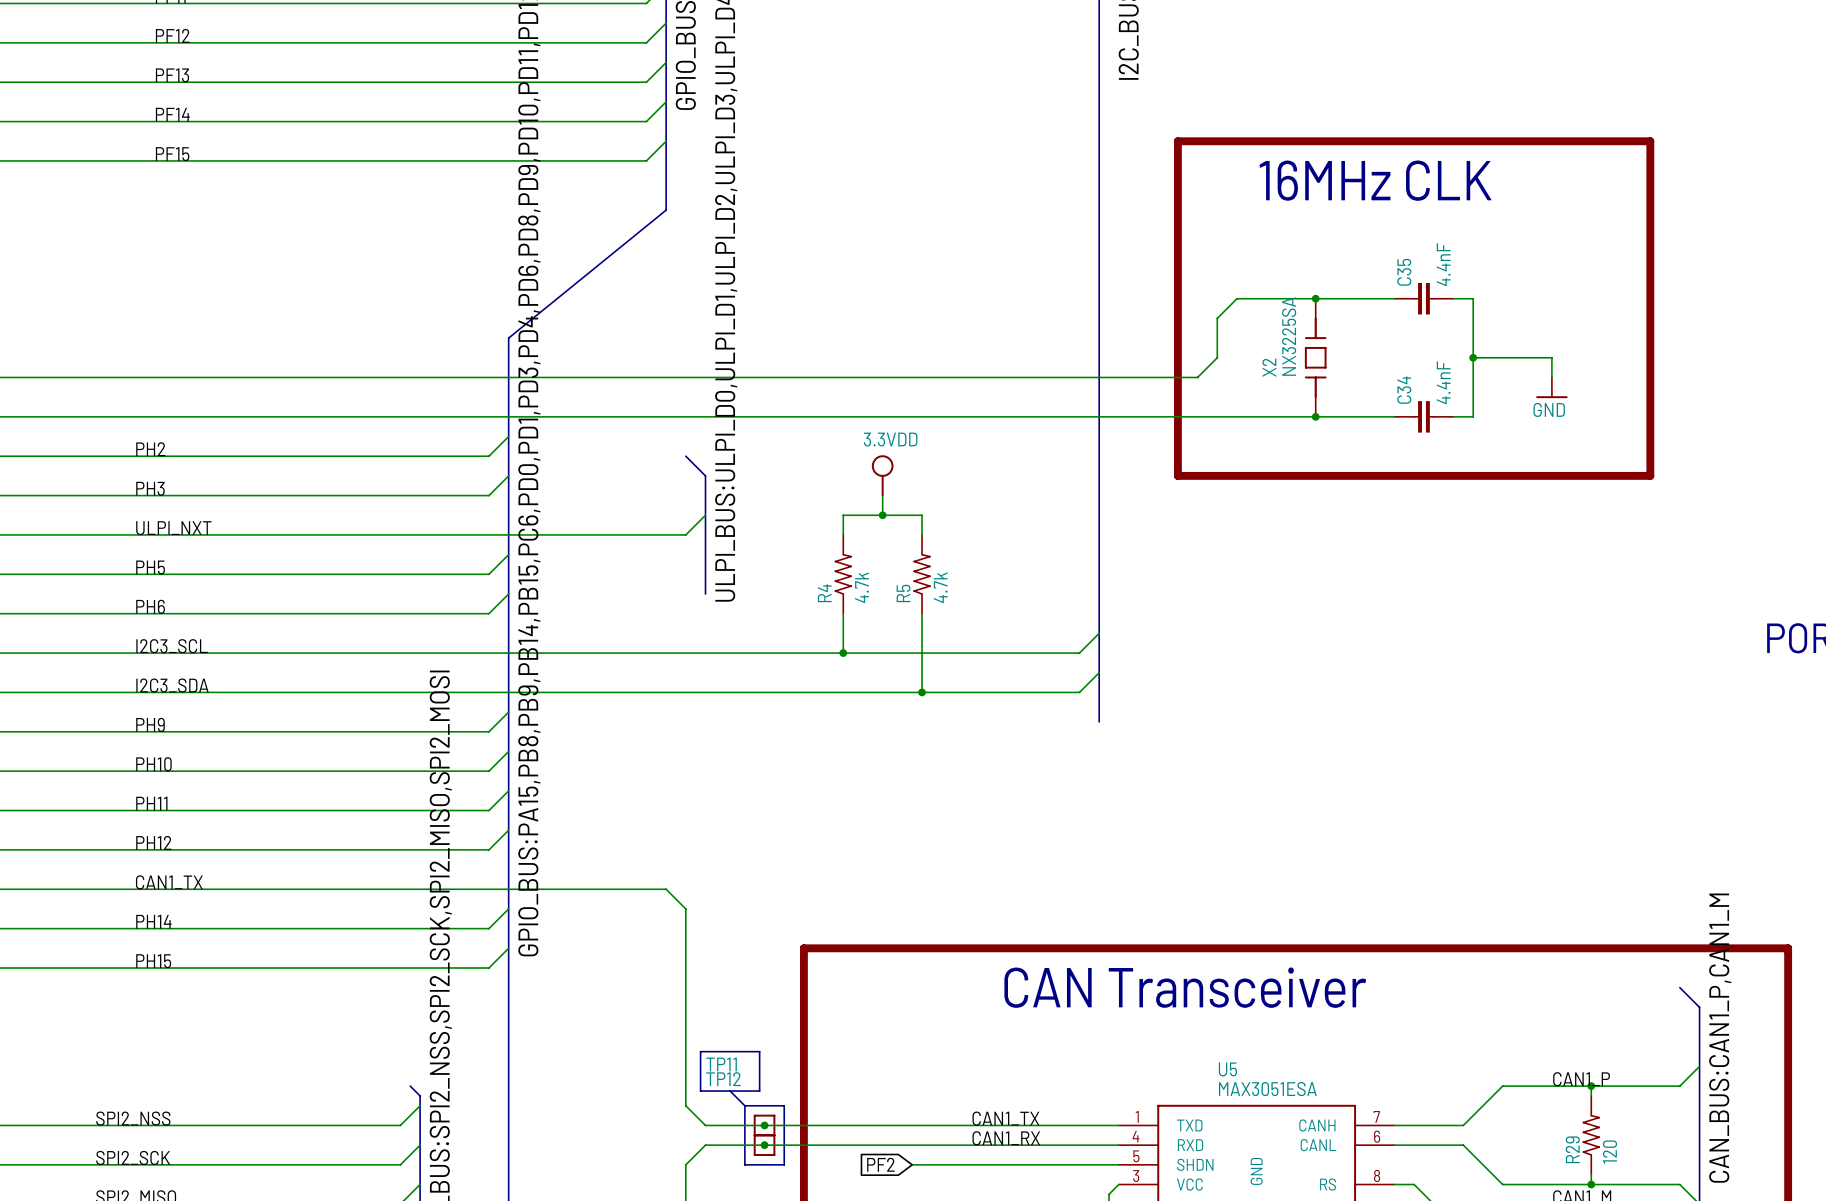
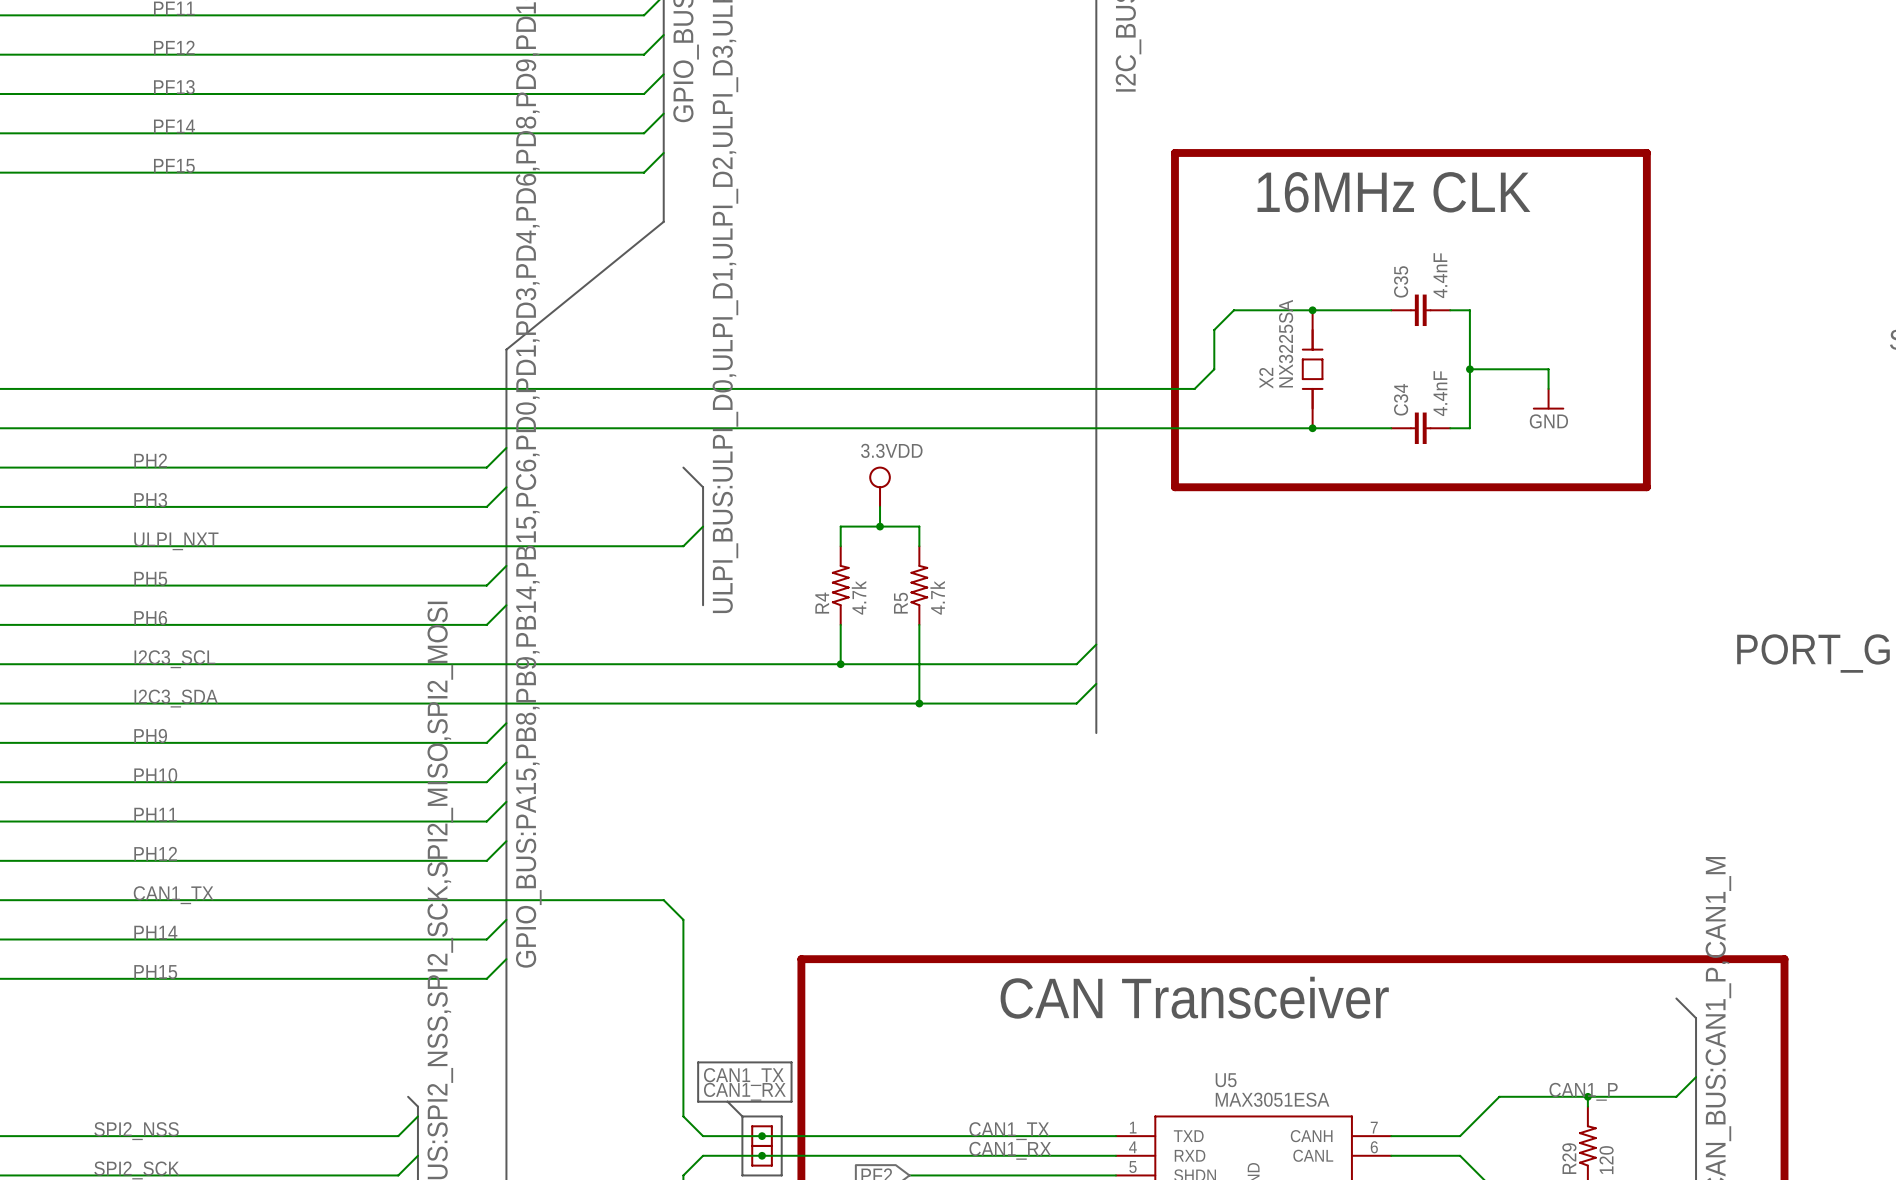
line: (759, 1051) (759, 1091) -> (757, 1062) (791, 1062) (791, 1101) (757, 1101)
TP11 name: TP11 (721, 1064) -> CAN1_TX (743, 1077)
TP12 name: TP12 (723, 1079) -> CAN1_RX (744, 1091)

